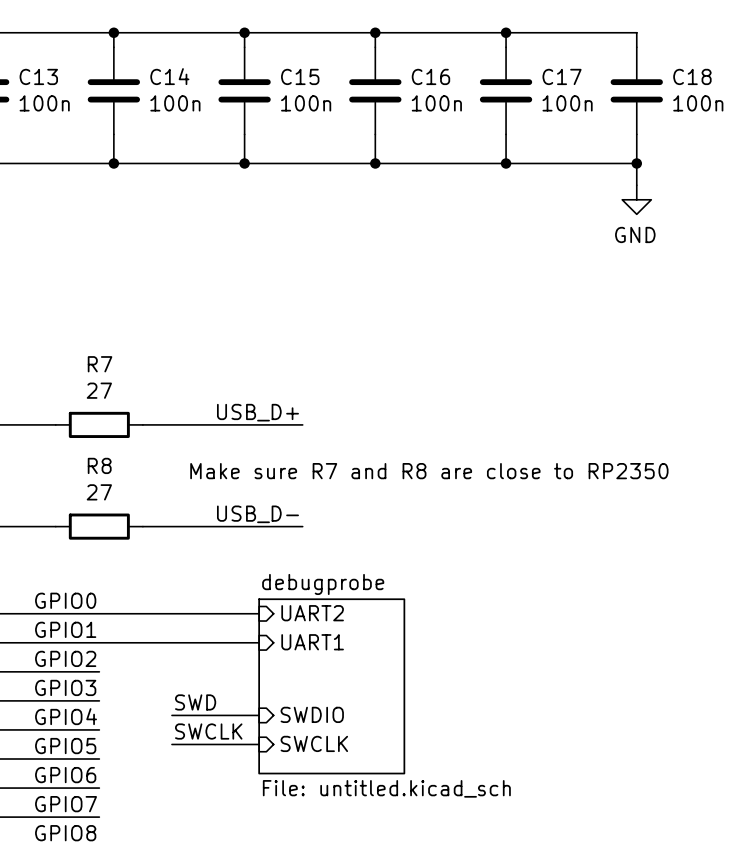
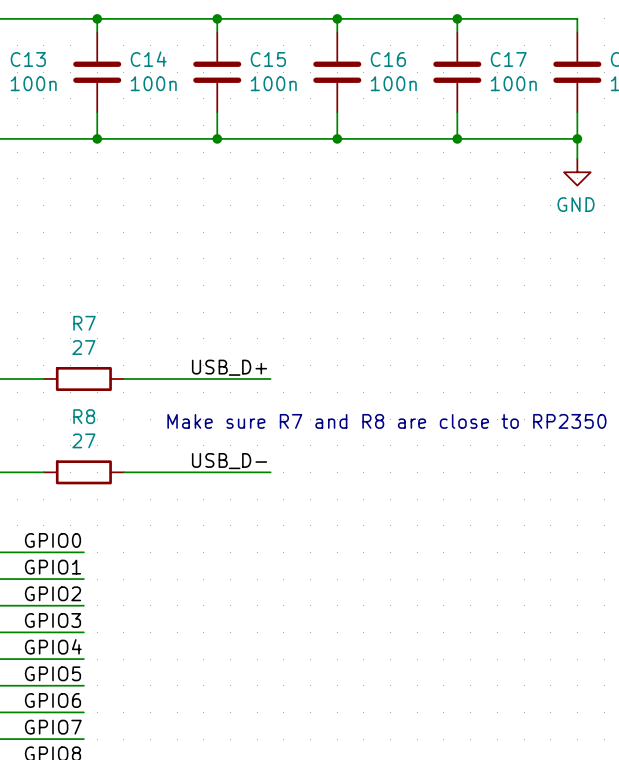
wire: (99, 613) (259, 613) -> none
sheet pin: UART2 (312, 613) -> none
wire: (99, 642) (259, 642) -> none
sheet pin: UART1 (312, 642) -> none
sheet debugprobe: File: untitled.kicad_sch (331, 686) -> none
label: SWD (195, 702) -> none
sheet pin: SWDIO (312, 714) -> none
wire: (171, 715) (259, 715) -> none
label: SWCLK (208, 731) -> none
sheet pin: SWCLK (314, 743) -> none
wire: (171, 744) (259, 744) -> none

